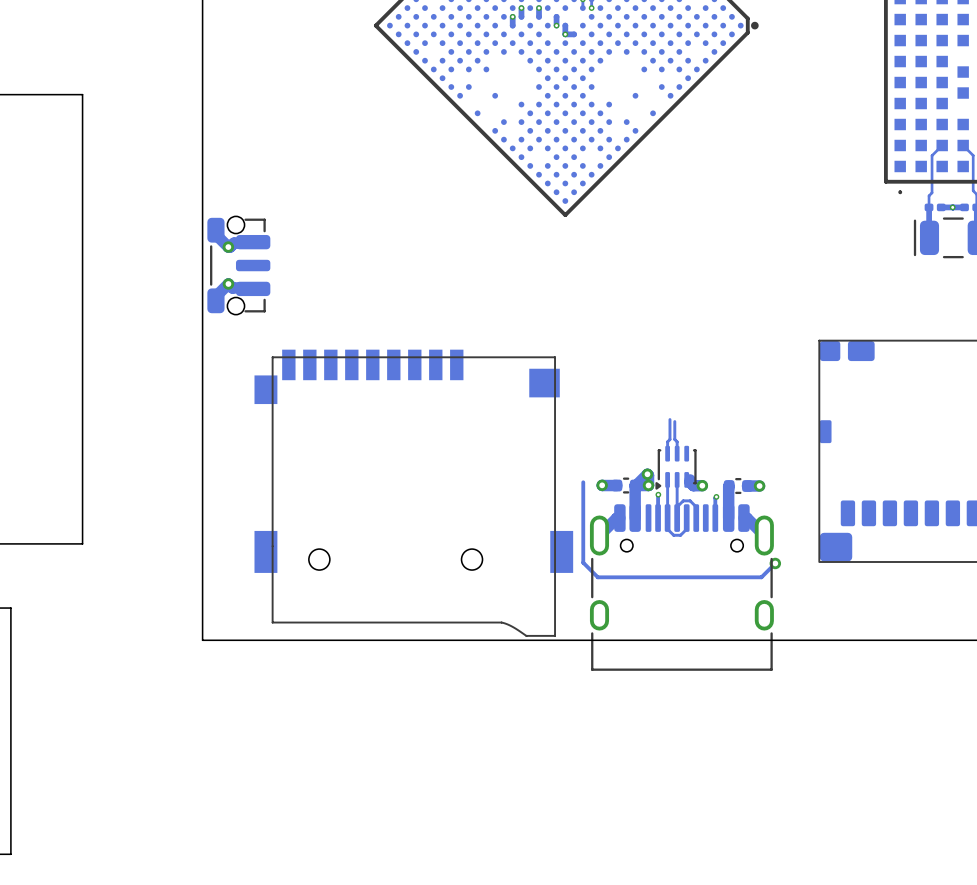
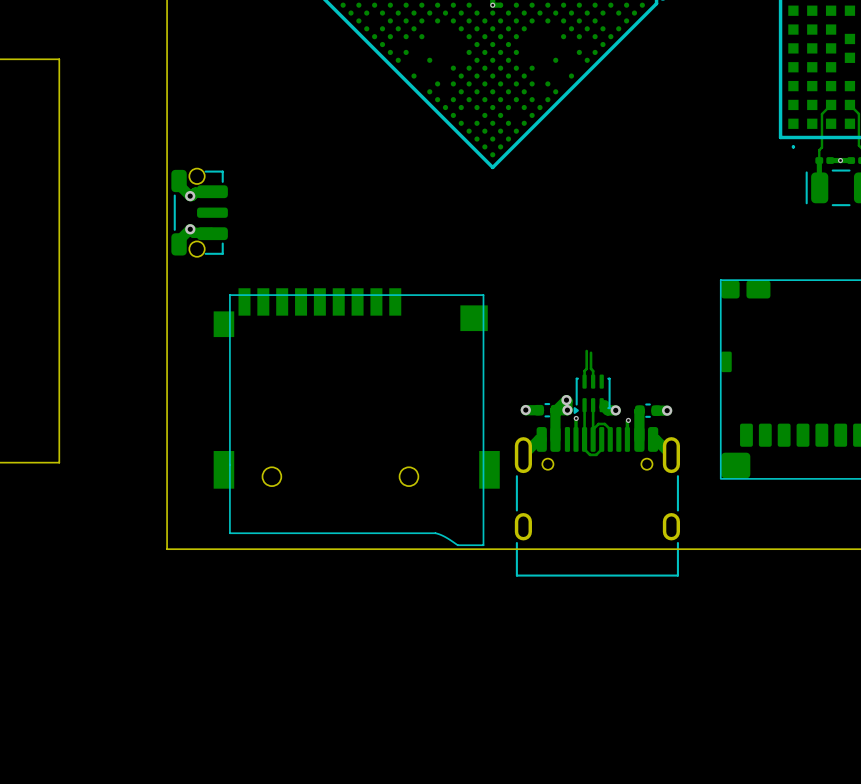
track: (583, 482) (583, 562) (597, 577) (761, 577) (775, 563) -> none
via: (775, 563) -> none

